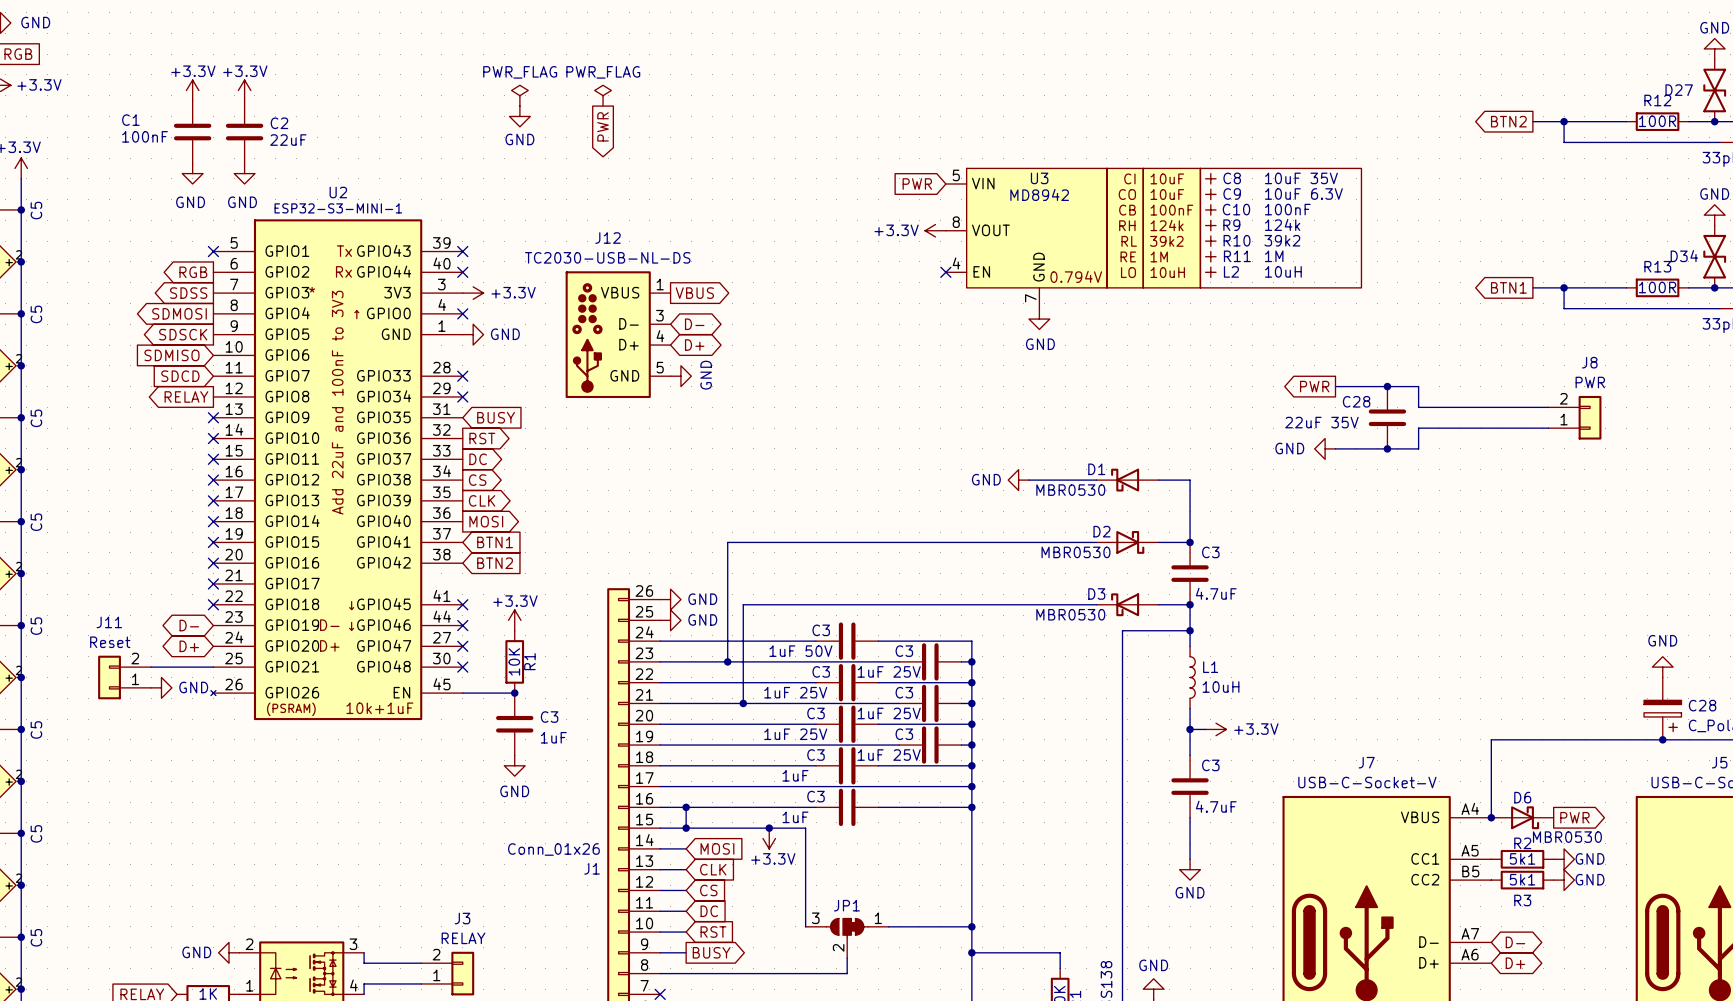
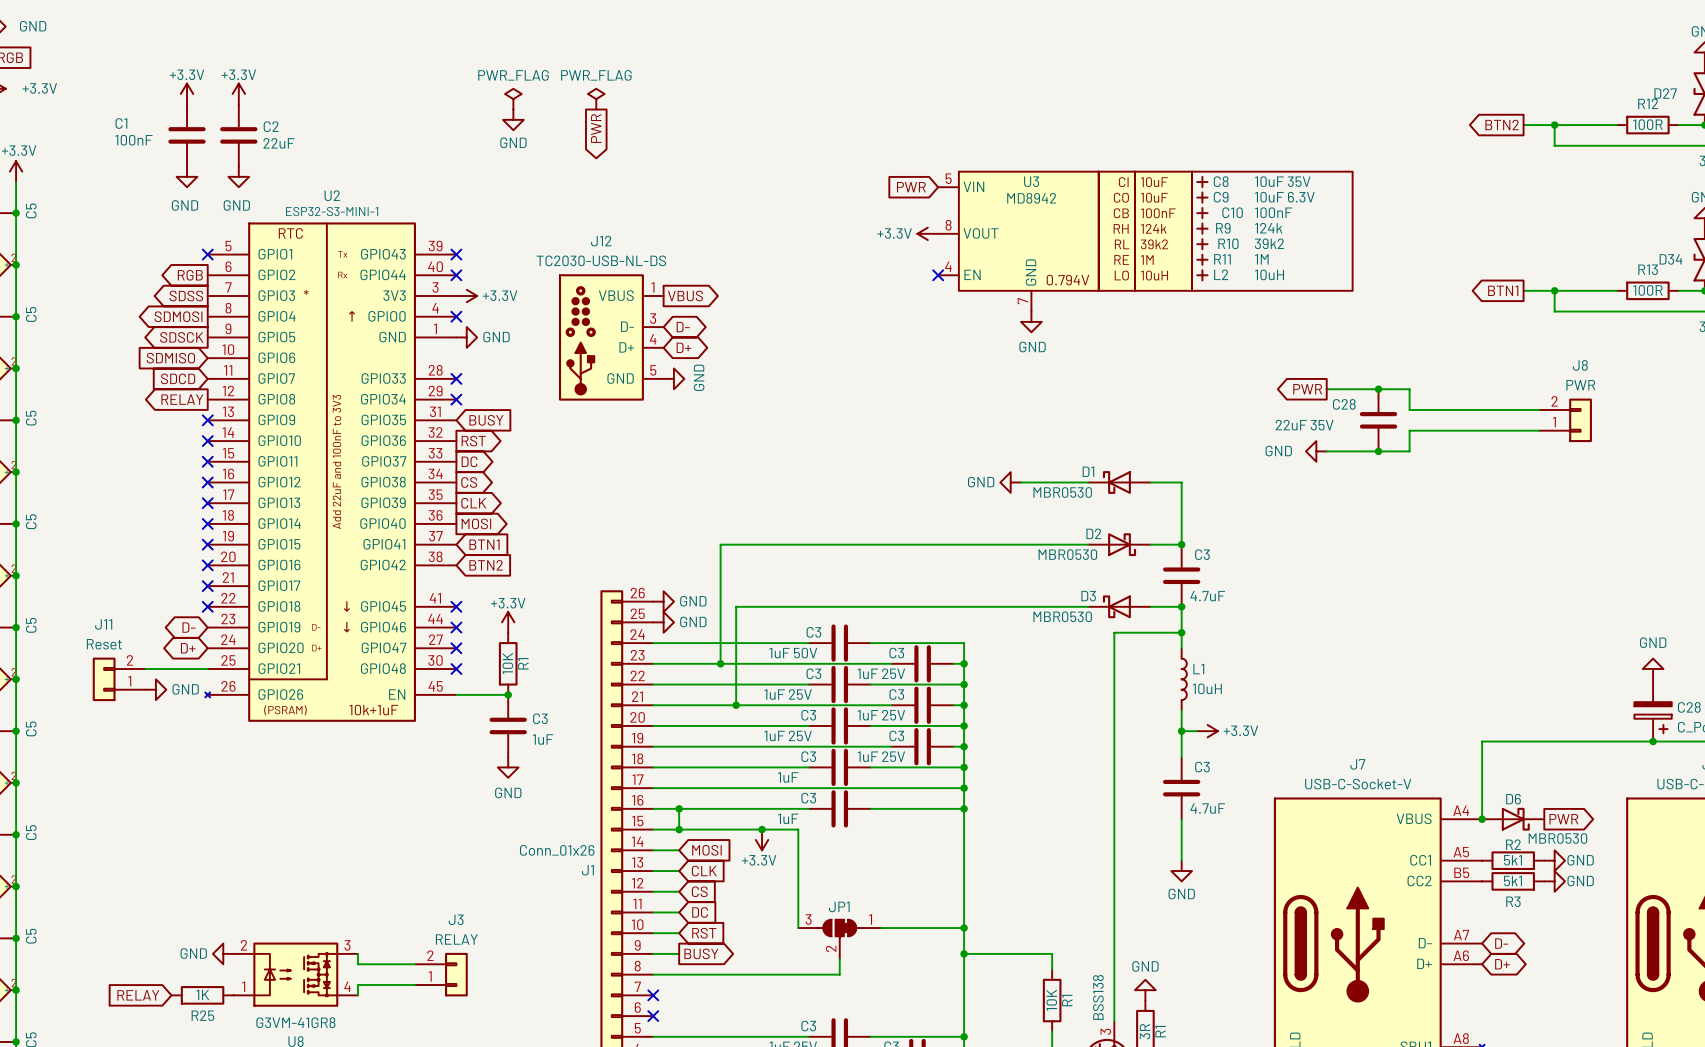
U2 symbol: [210, 219, 463, 721] -> [205, 222, 457, 722]

